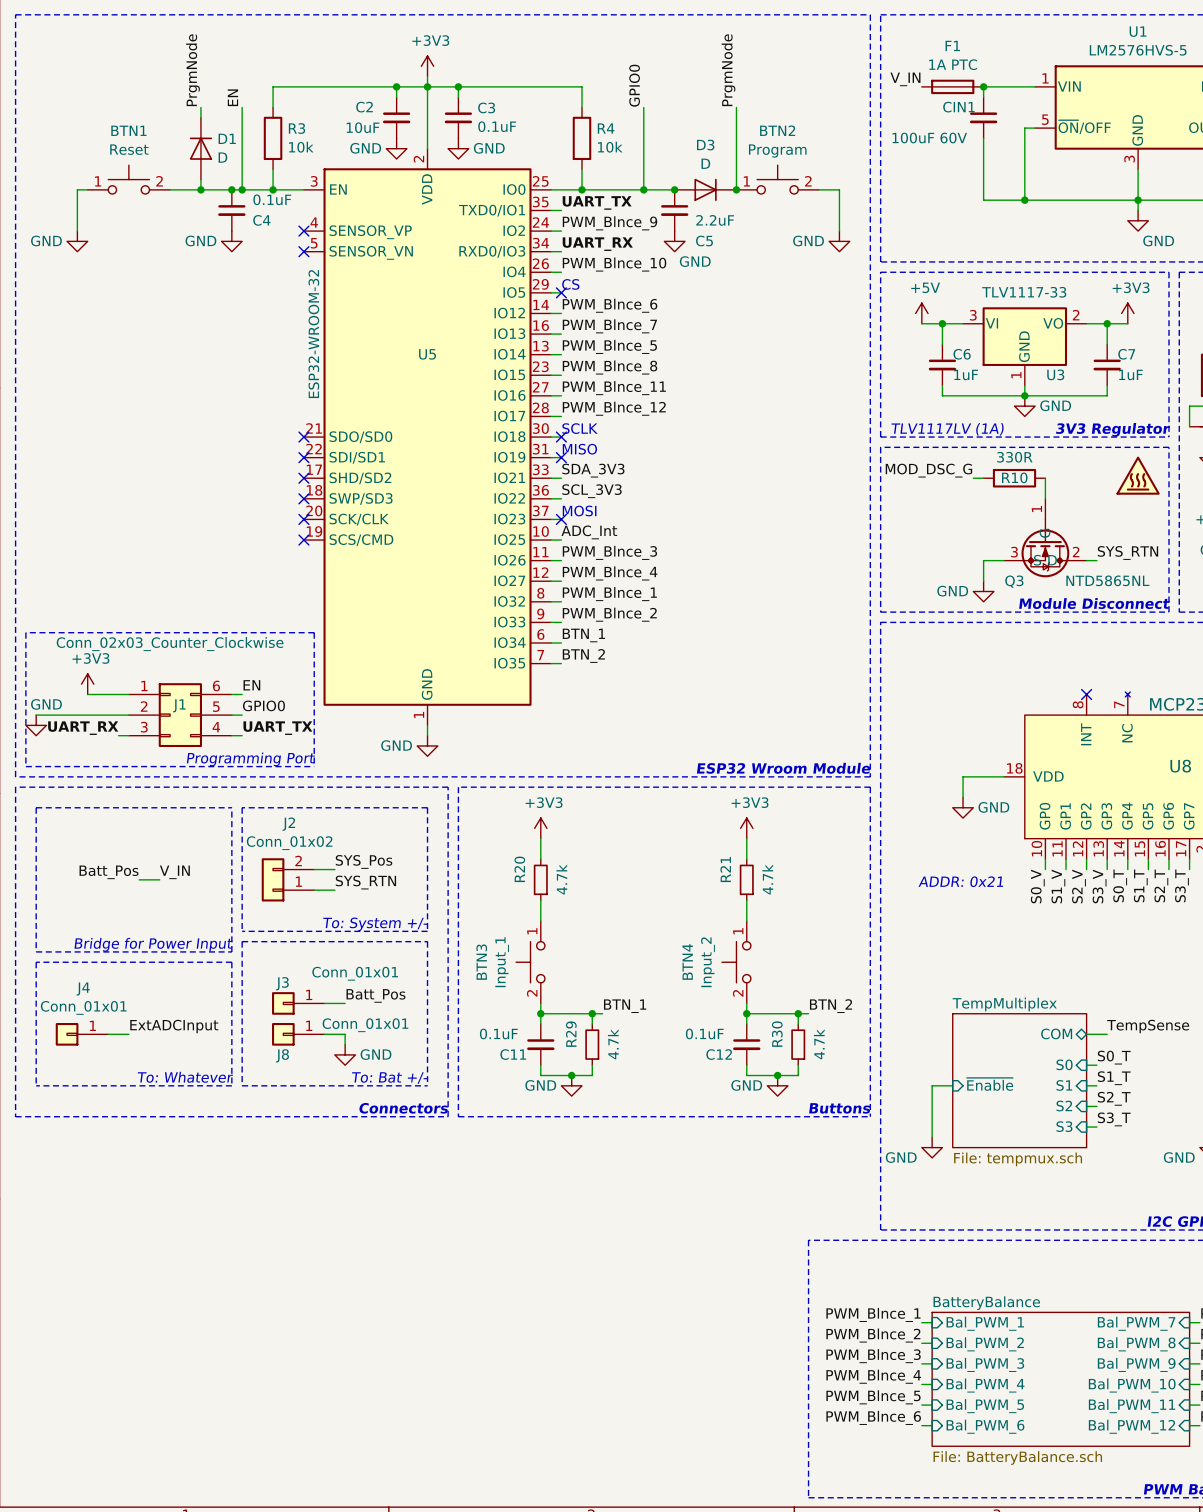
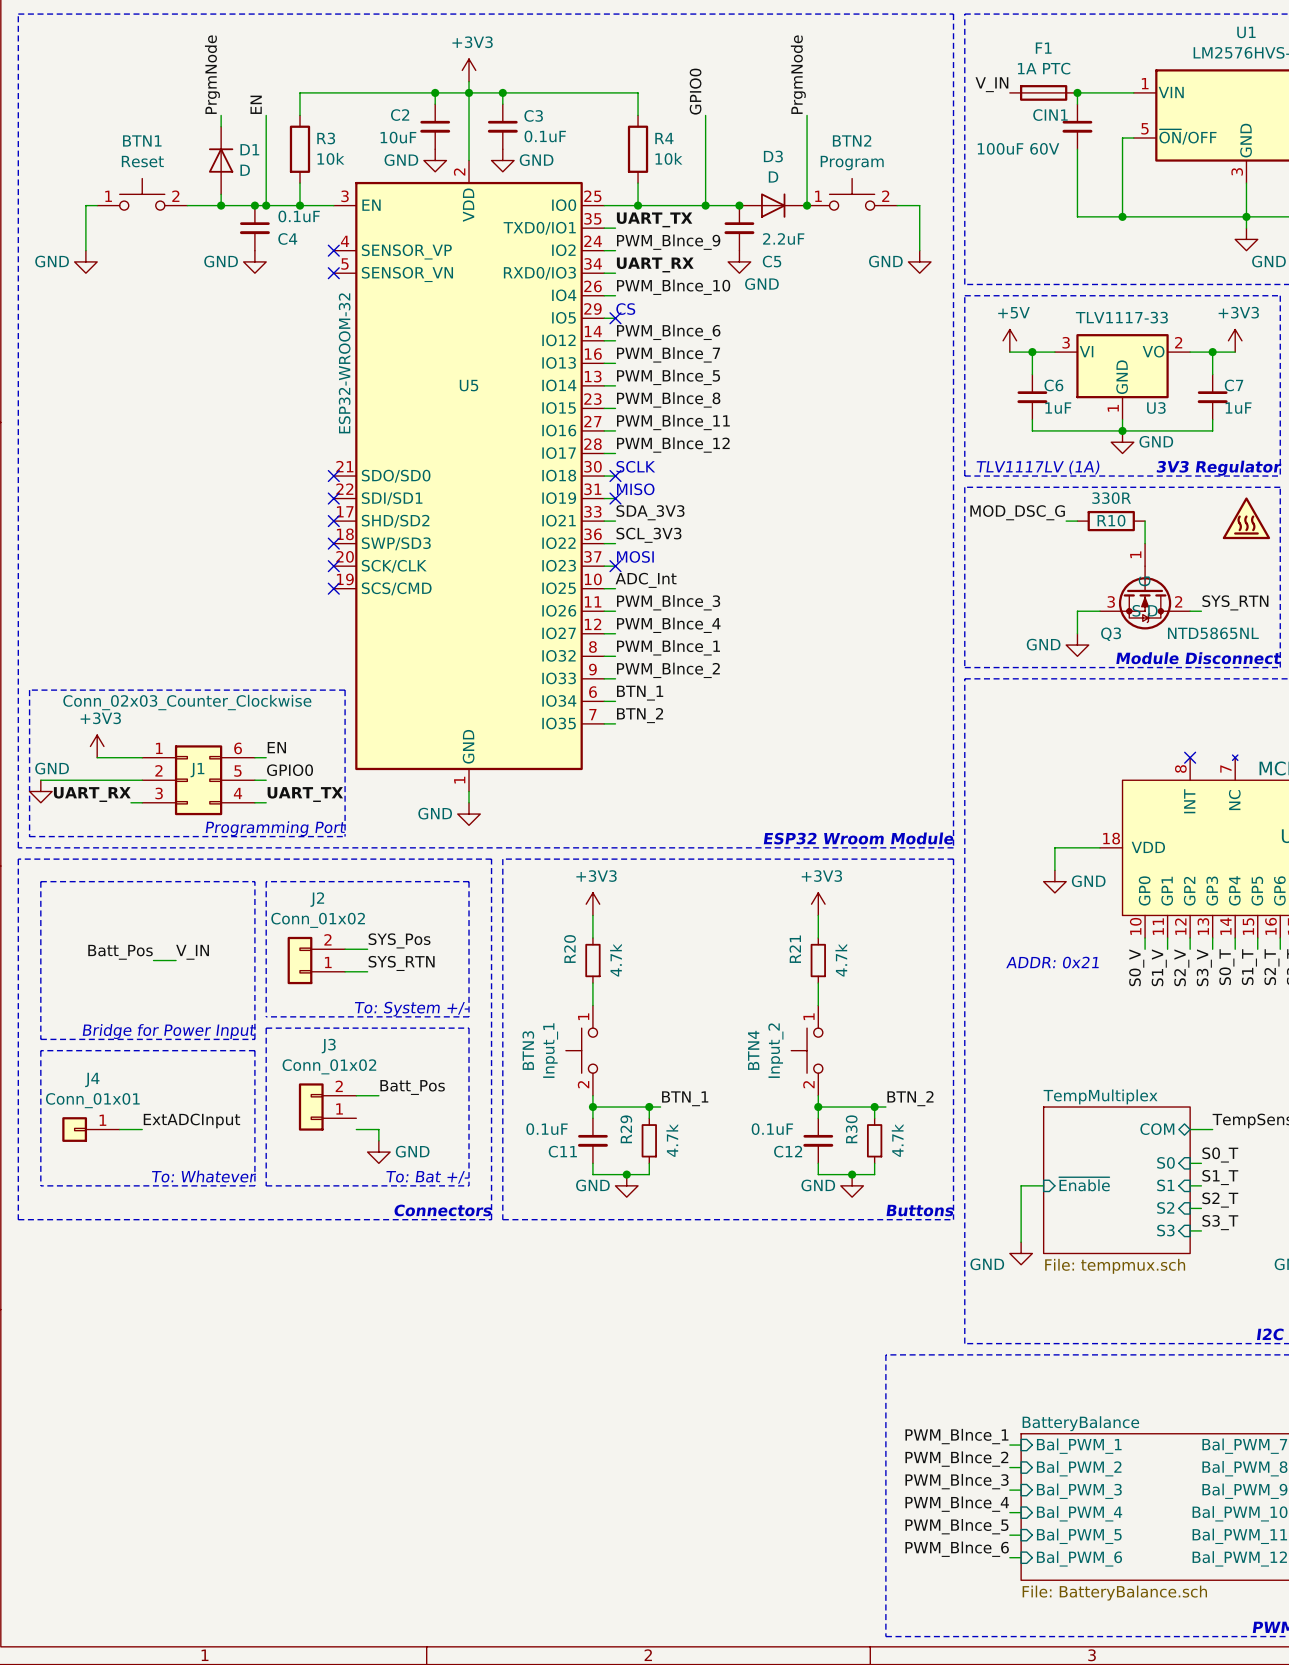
J3 value: Conn_01x01 (355, 973) -> Conn_01x02 (329, 1066)
J3 name position: J3 (282, 983) -> J3 (328, 1046)
J3 symbol: [272, 992, 325, 1015] -> [298, 1083, 357, 1131]
J8: Conn_01x01 (298, 1034) -> none

